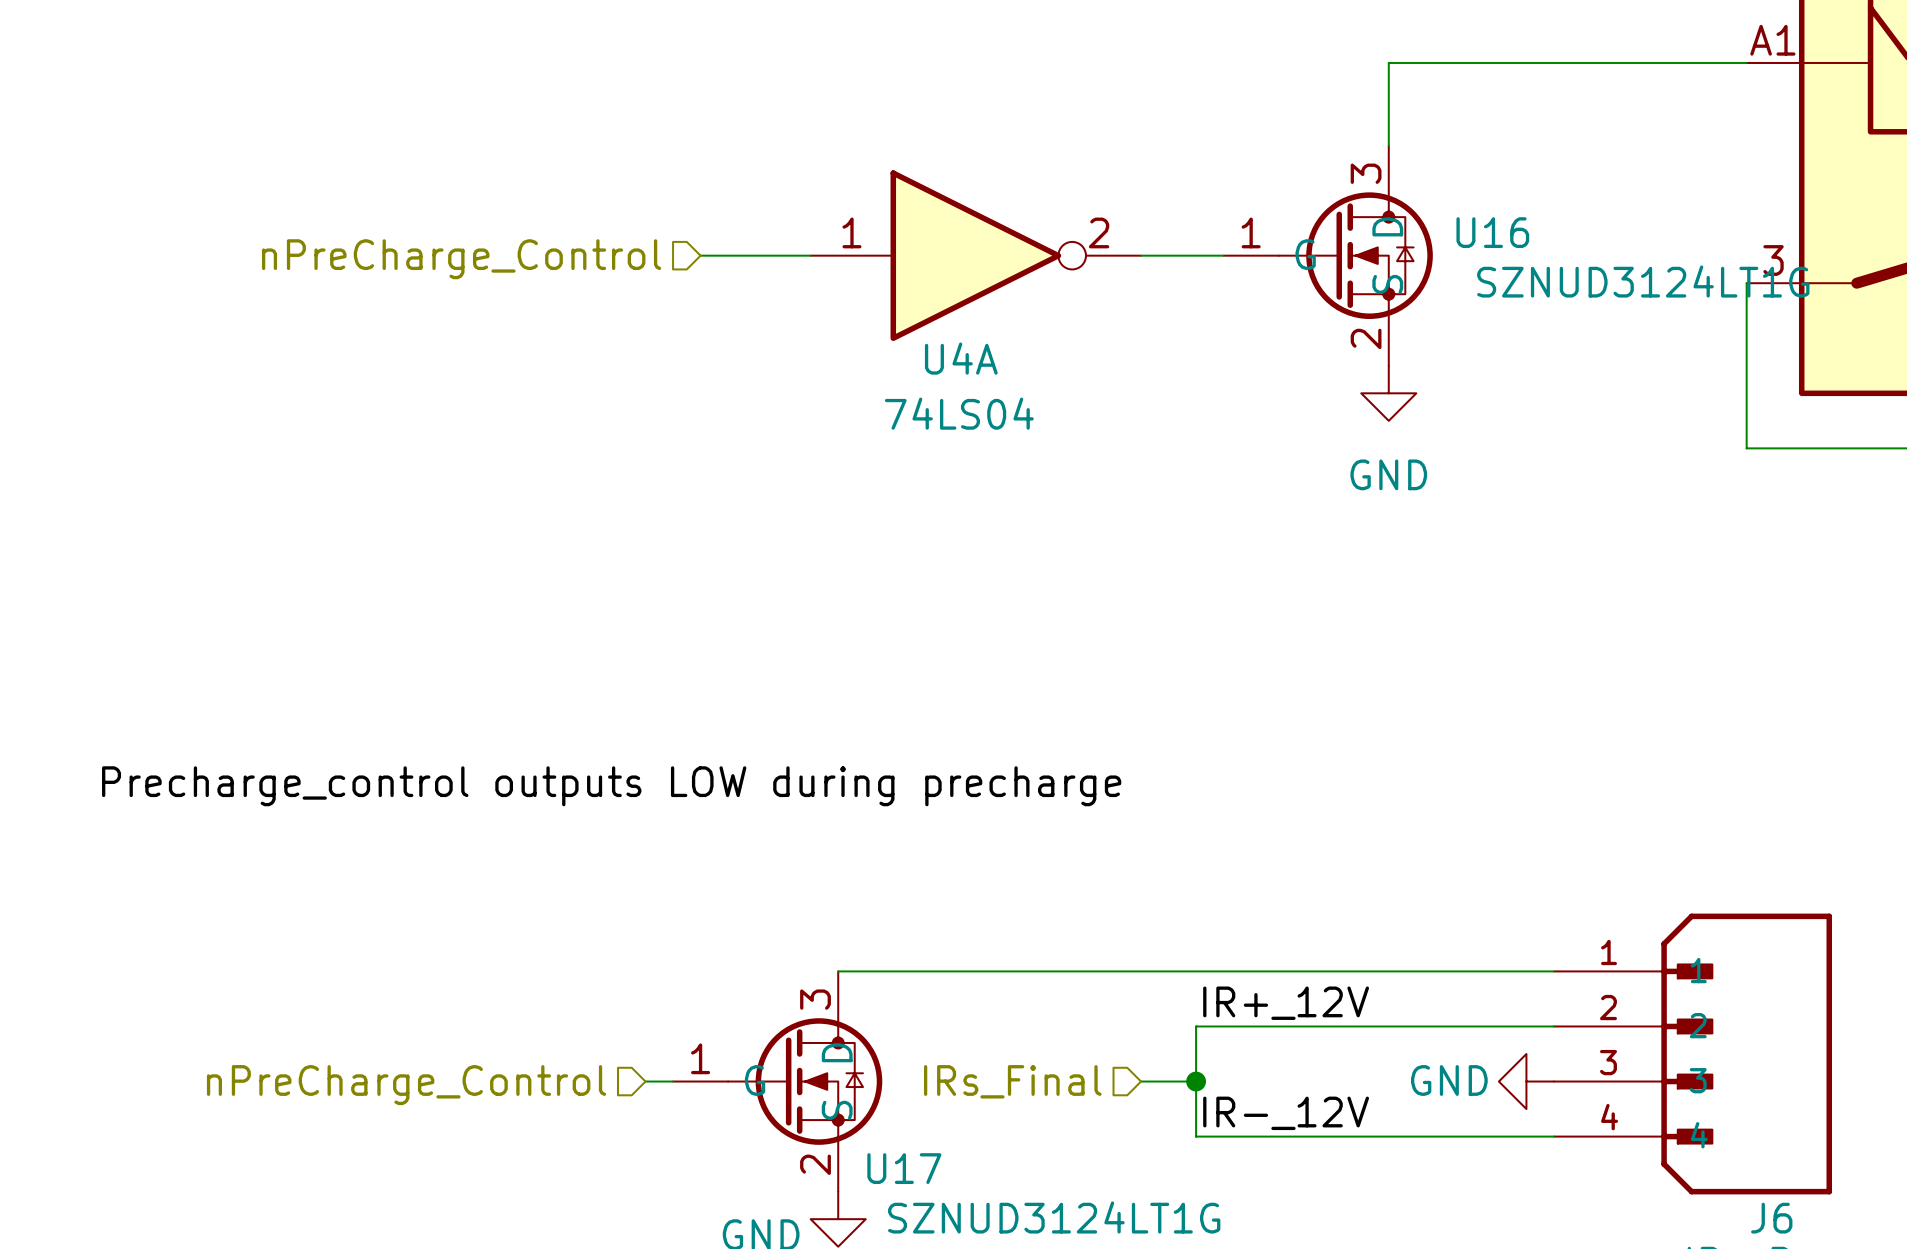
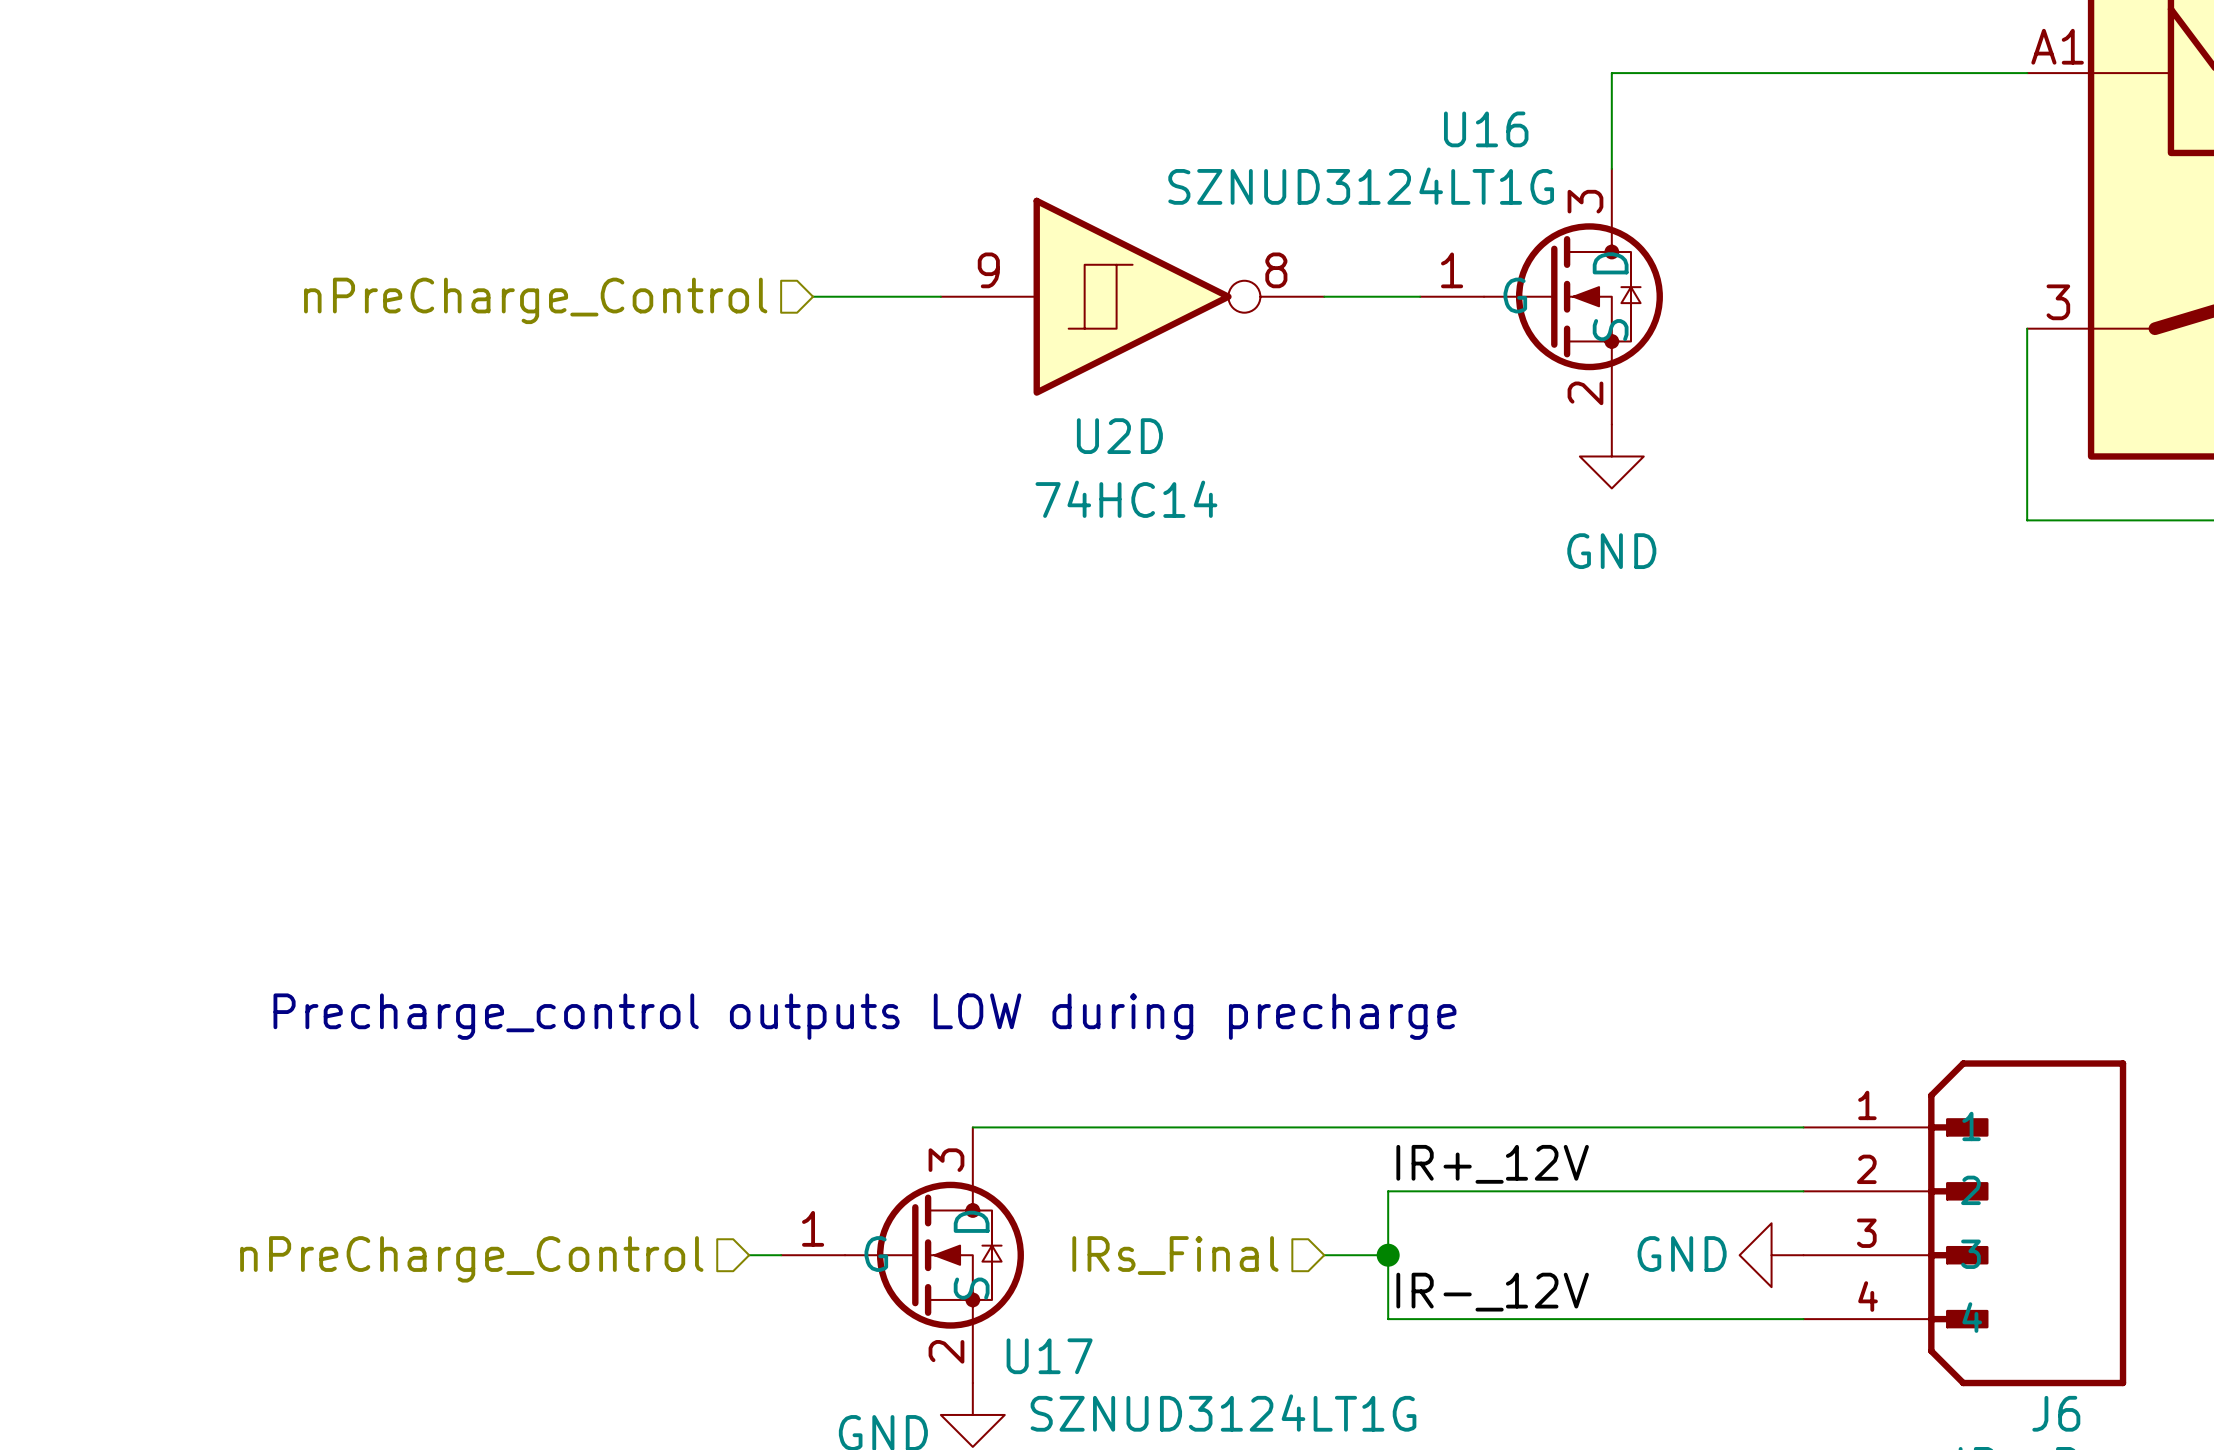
U16 name position: U16 (1492, 232) -> U16 (1486, 129)
U4A: 74LS04 (975, 255) -> none
U2D: none -> 74HC14 (1132, 296)
U16 value position: SZNUD3124LT1G (1643, 281) -> SZNUD3124LT1G (1361, 186)
label: Precharge_control outputs LOW during precharge (611, 786) -> none
text: none -> Precharge_control outputs LOW during precharge (864, 1016)

